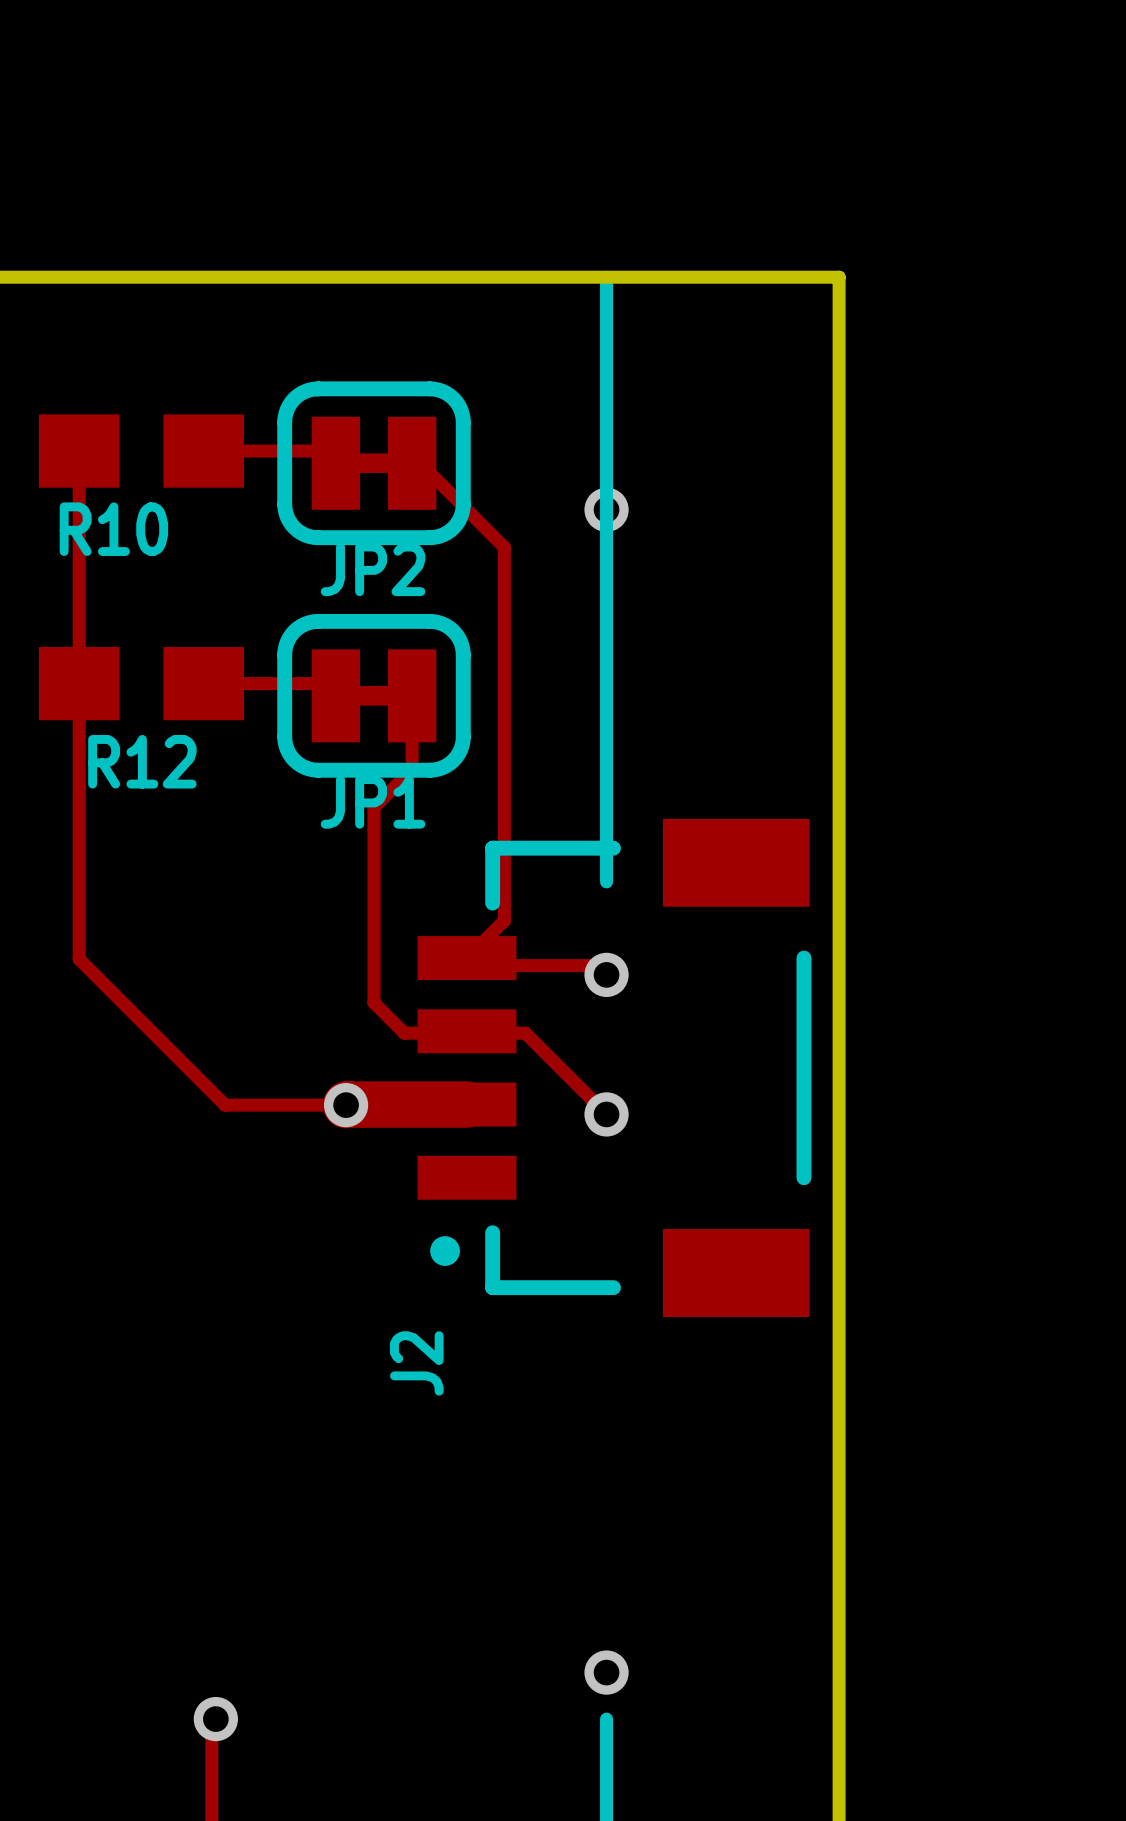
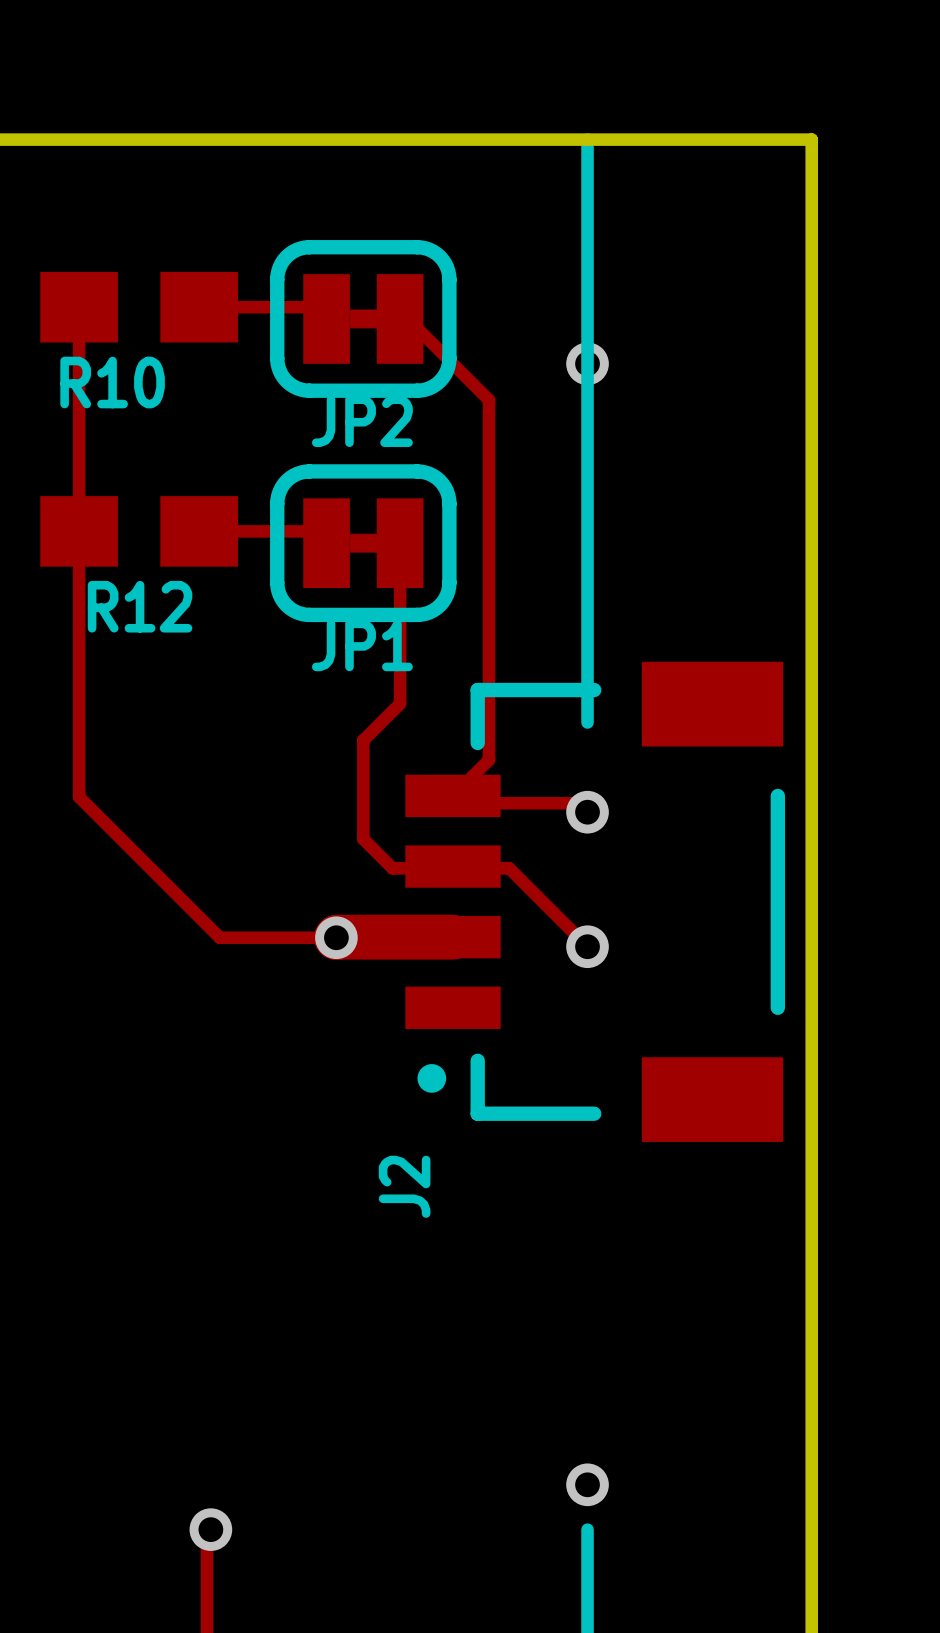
track: (412, 769) (373, 807) (373, 900) -> (400, 614) (400, 703) (363, 740)

